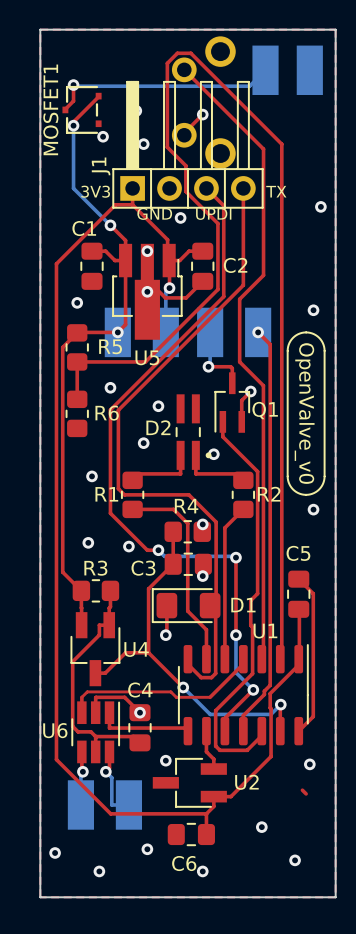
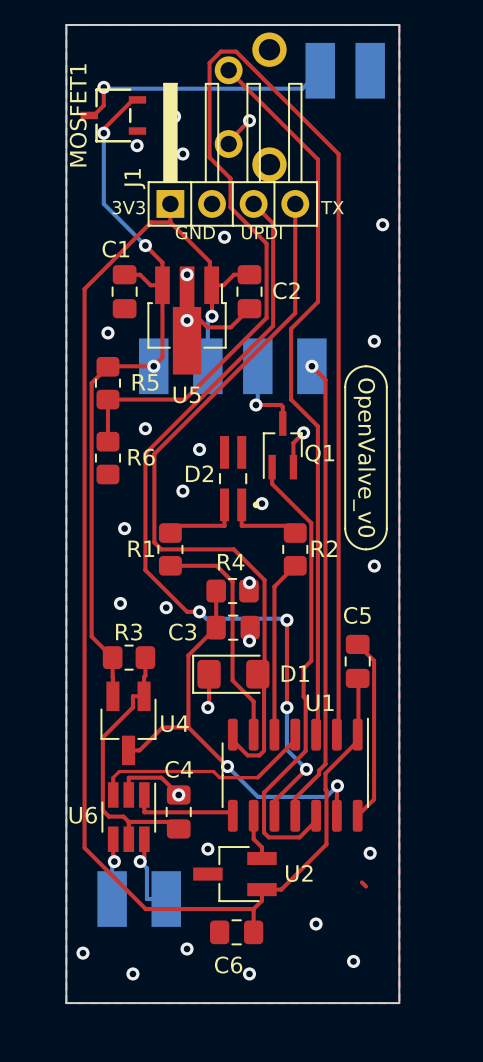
MOSFET1 footprint: [62, 85, 102, 134] -> [80, 88, 147, 143]

